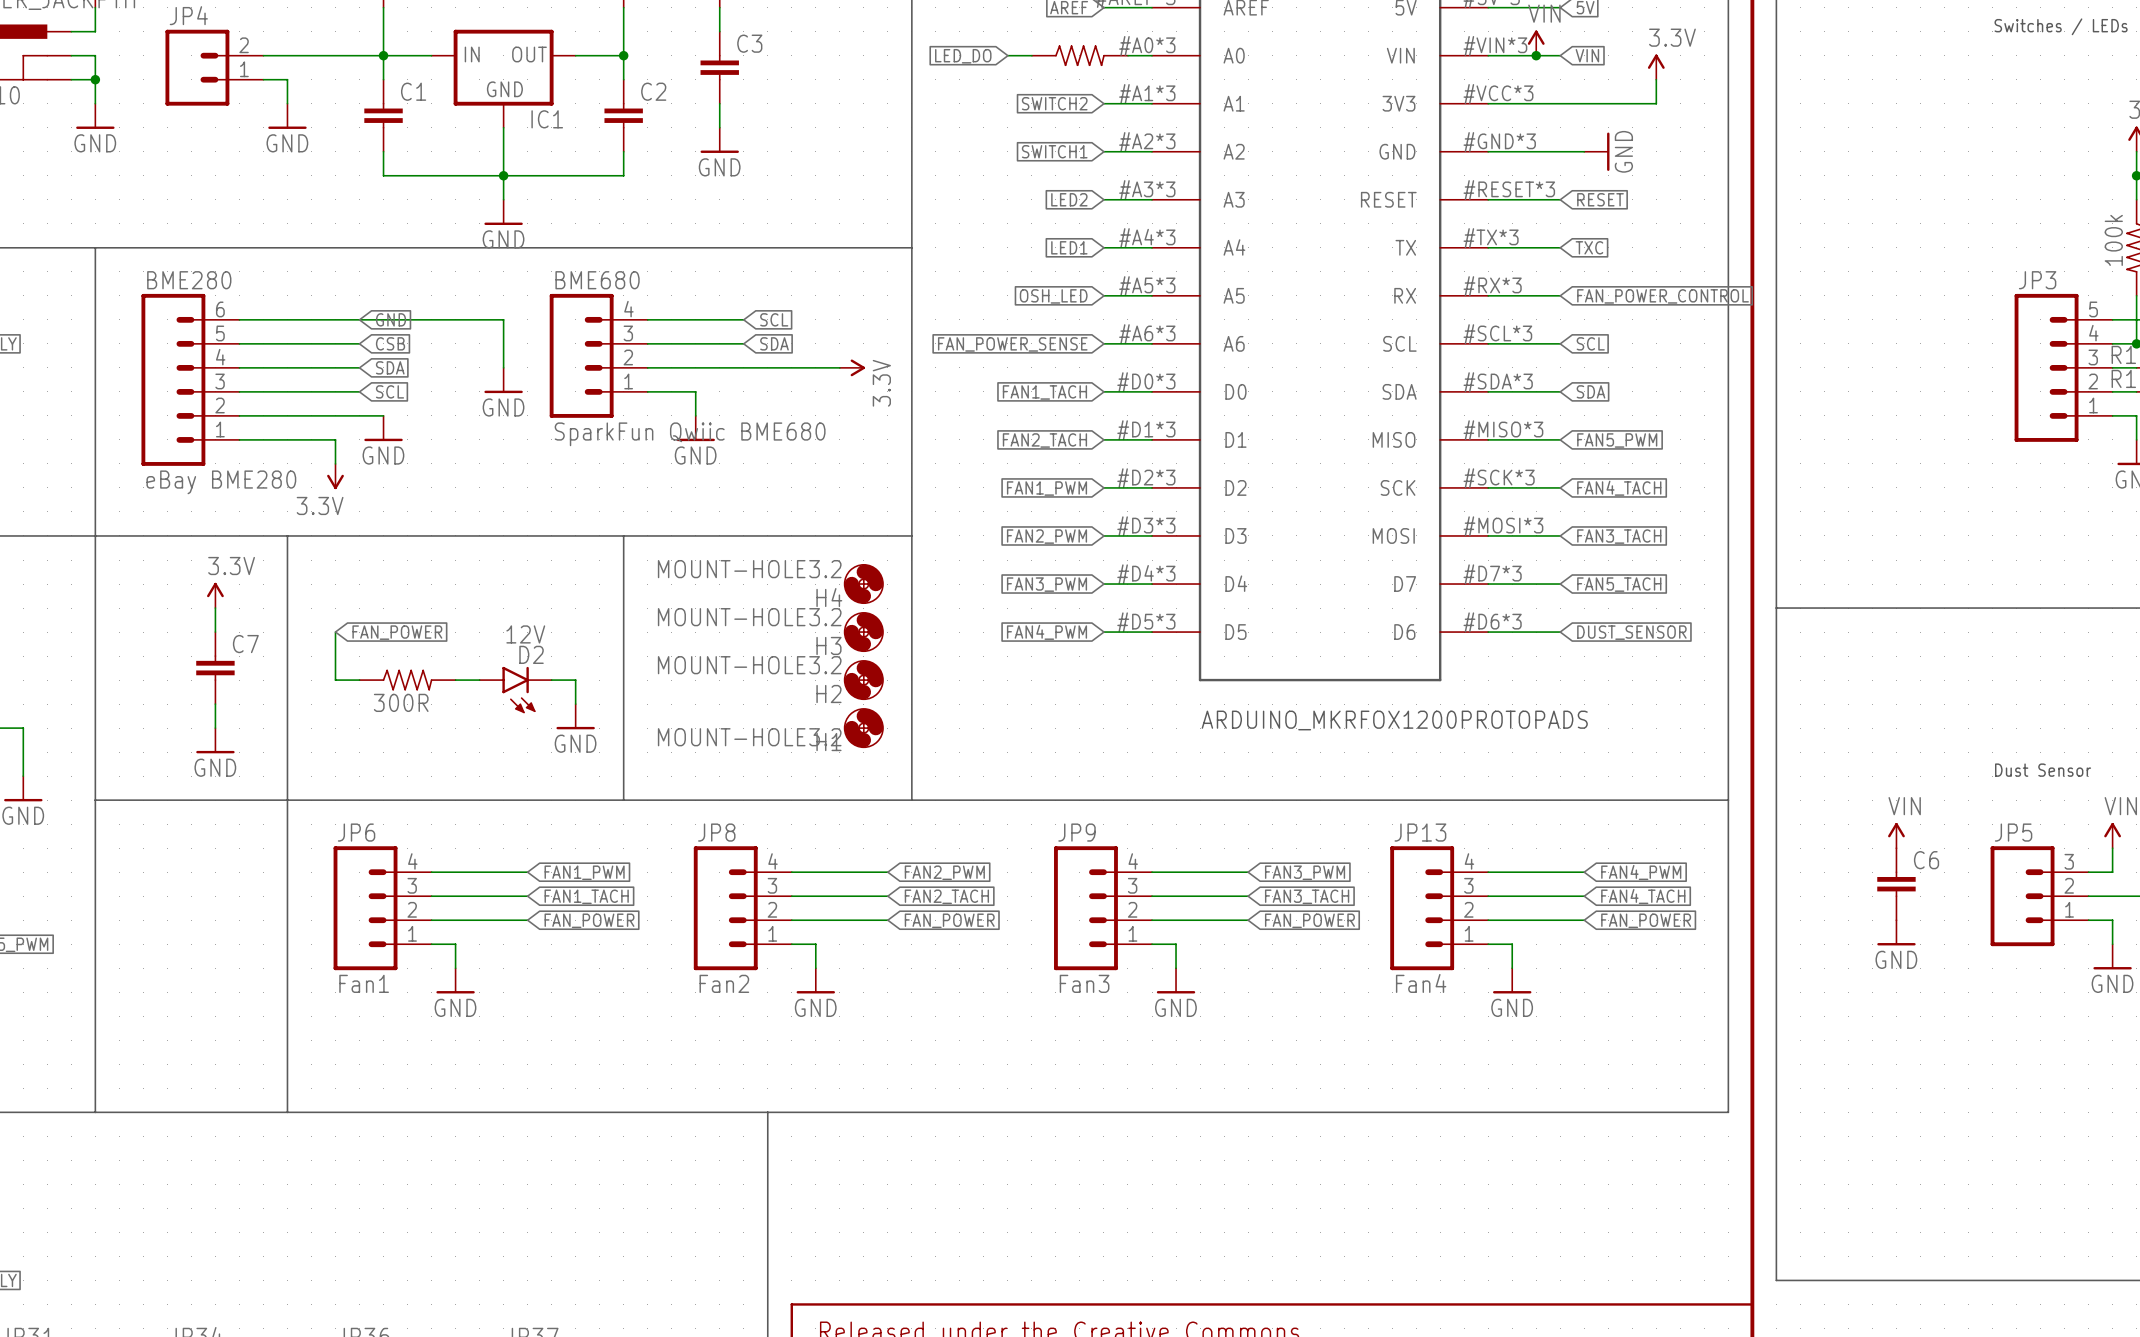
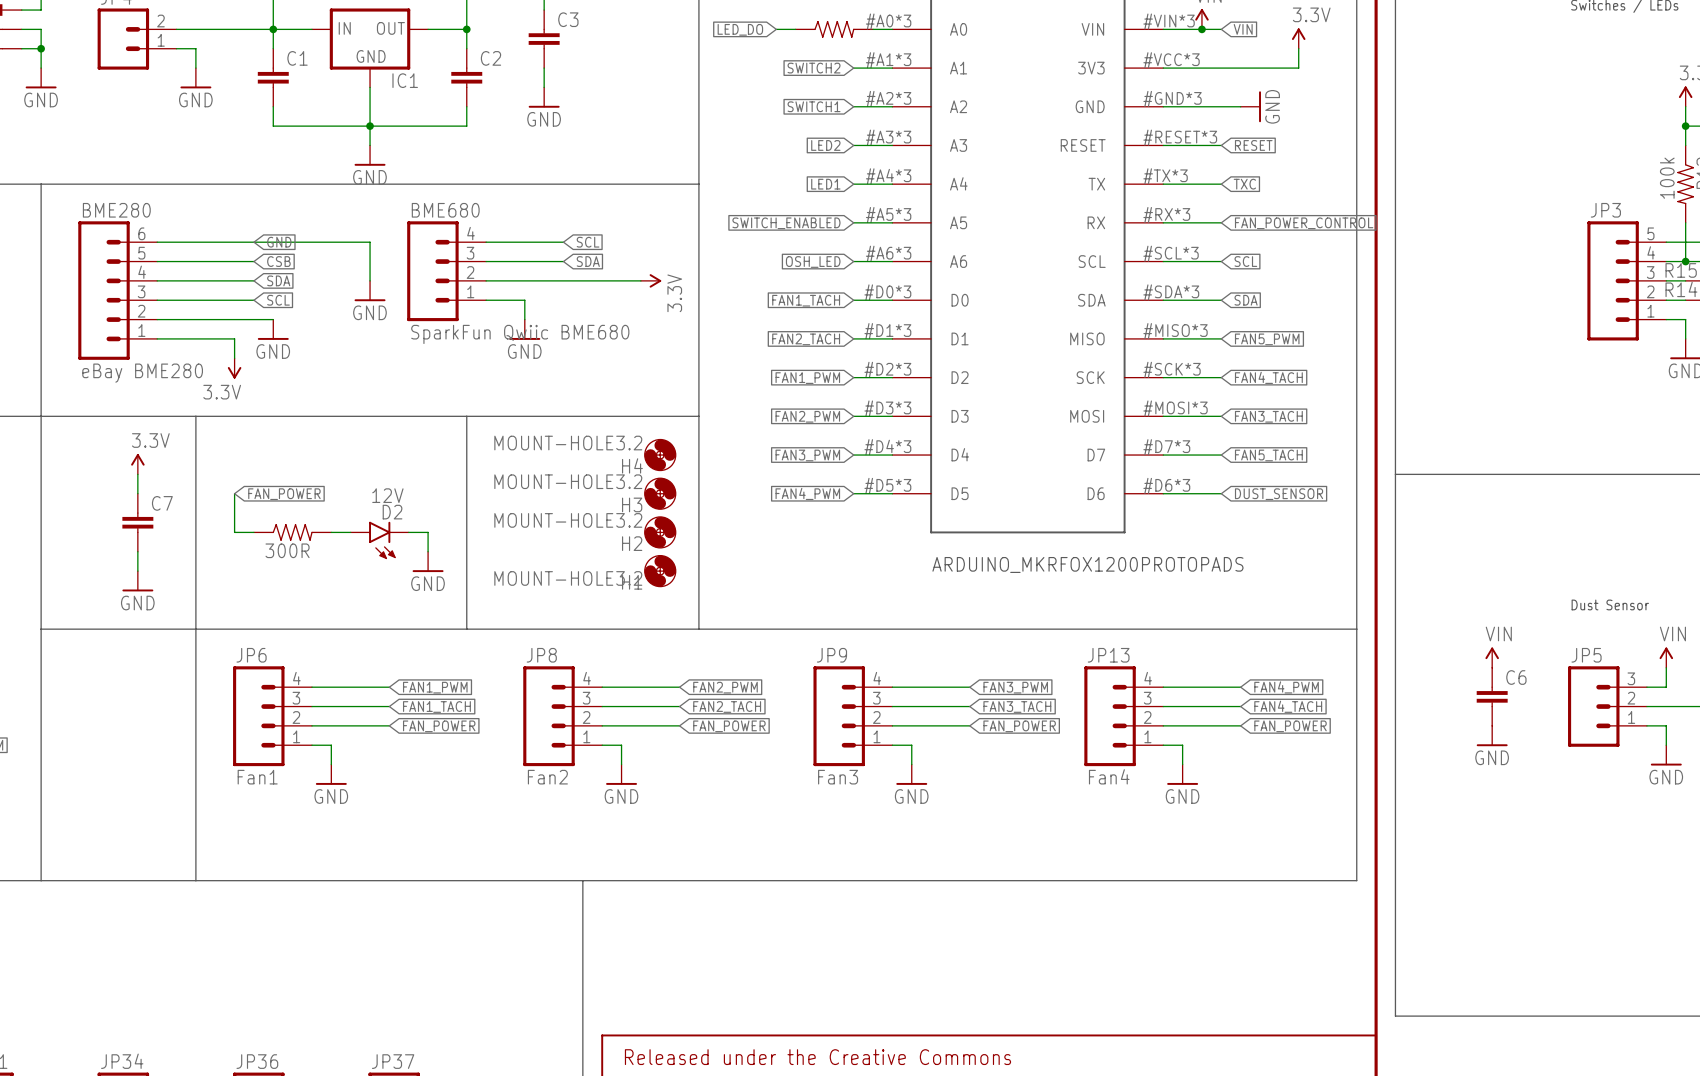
global label: OSH_LED (1053, 296) -> SWITCH_ENABLED (786, 223)
global label: FAN_POWER_SENSE (1012, 344) -> OSH_LED (813, 262)

